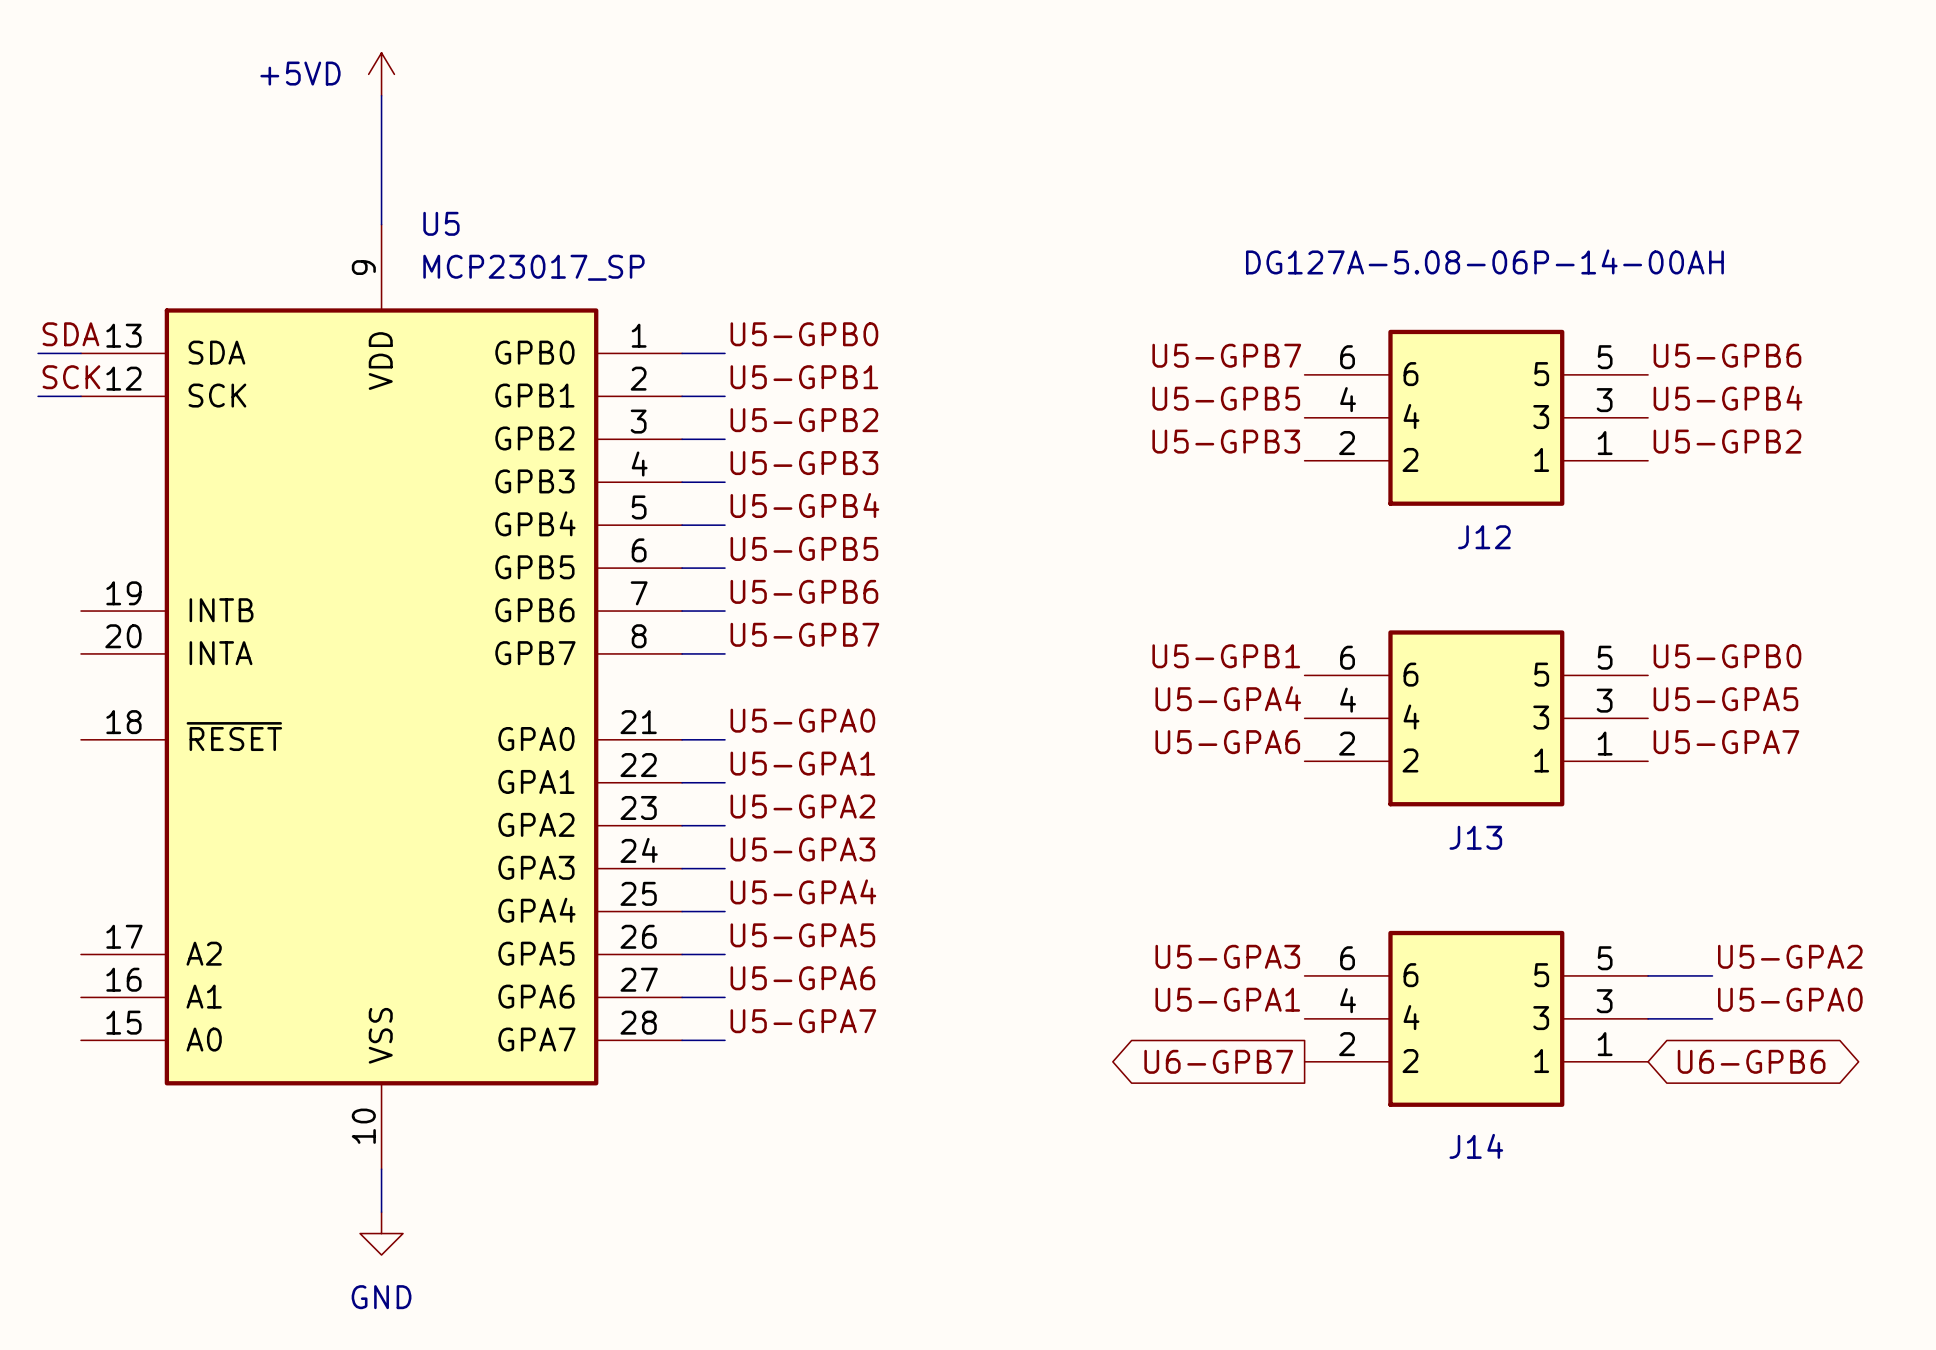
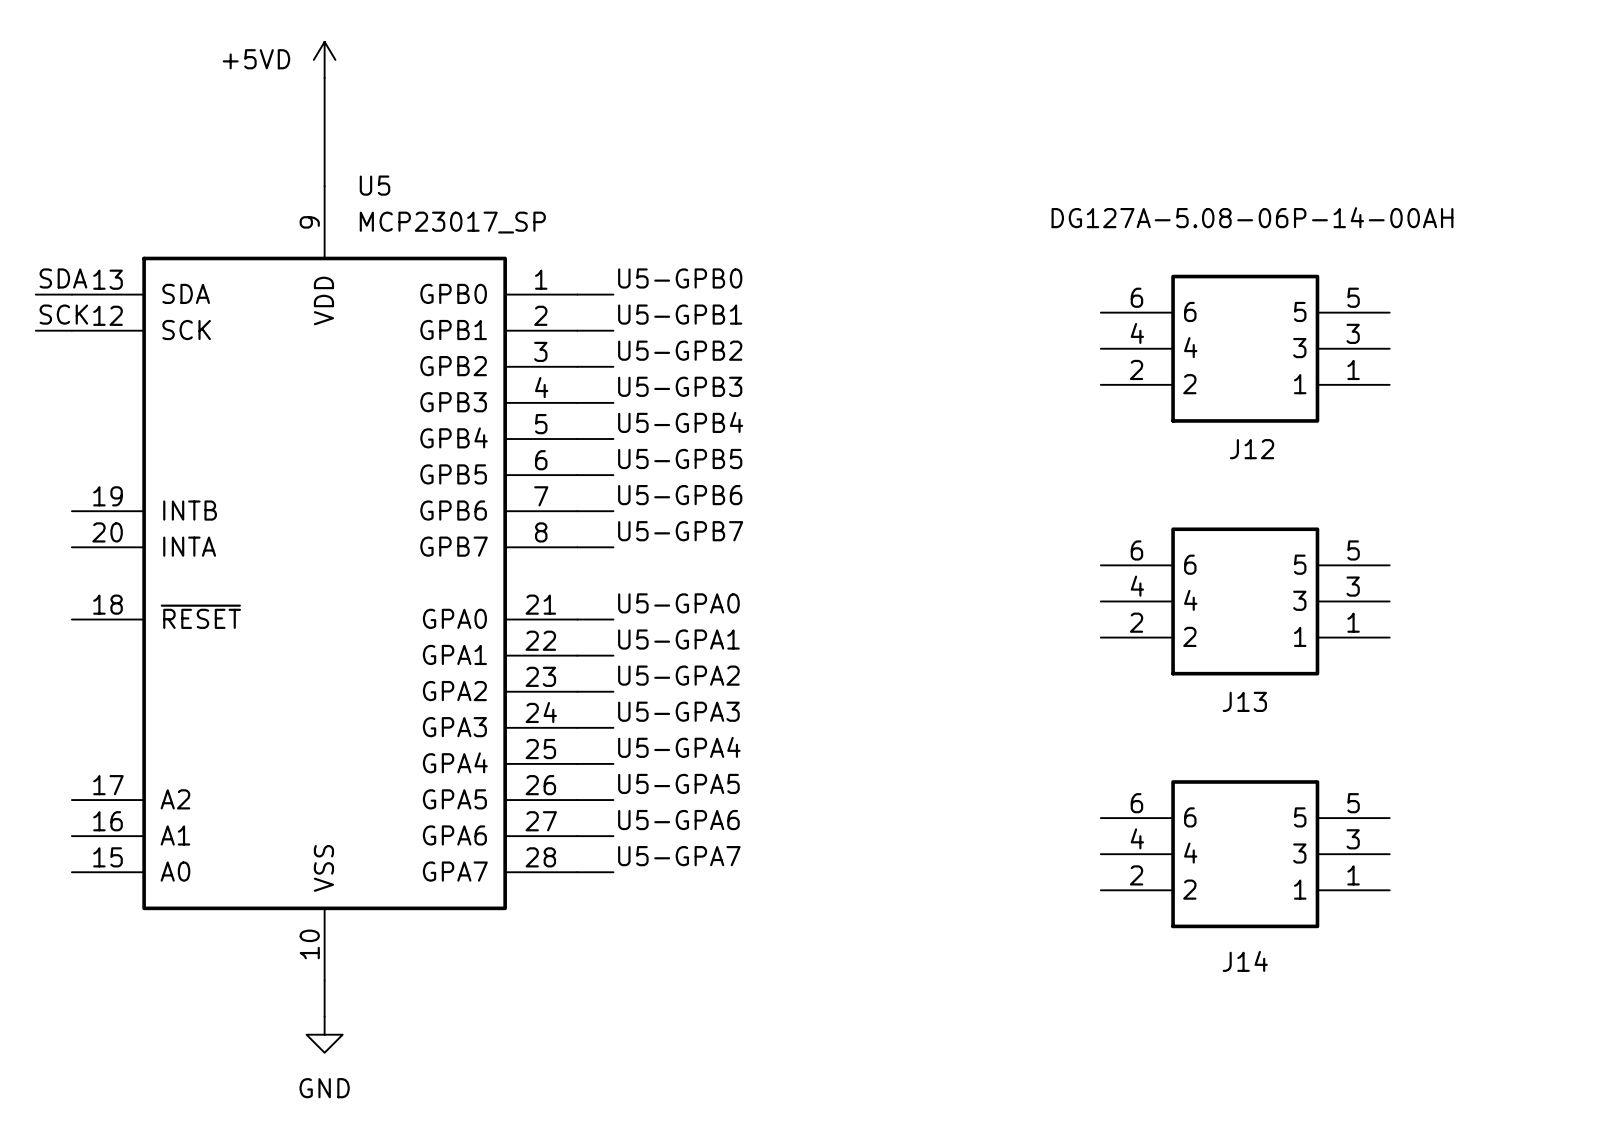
label: U5-GPB7 (1226, 355) -> none
label: U5-GPB6 (1727, 355) -> none
label: U5-GPB5 (1226, 398) -> none
label: U5-GPB4 (1727, 398) -> none
label: U5-GPB3 (1226, 441) -> none
label: U5-GPB2 (1727, 441) -> none
label: U5-GPB1 (1226, 656) -> none
label: U5-GPB0 (1727, 656) -> none
label: U5-GPA4 (1228, 698) -> none
label: U5-GPA5 (1725, 699) -> none
label: U5-GPA6 (1227, 742) -> none
label: U5-GPA7 (1726, 742) -> none
label: U5-GPA3 (1227, 956) -> none
label: U5-GPA2 (1790, 956) -> none
wire: (1648, 975) (1712, 975) -> none
label: U5-GPA1 (1227, 999) -> none
label: U5-GPA0 (1790, 999) -> none
wire: (1648, 1018) (1712, 1018) -> none
global label: U6-GPB7 (1218, 1061) -> none
global label: U6-GPB6 (1751, 1061) -> none

